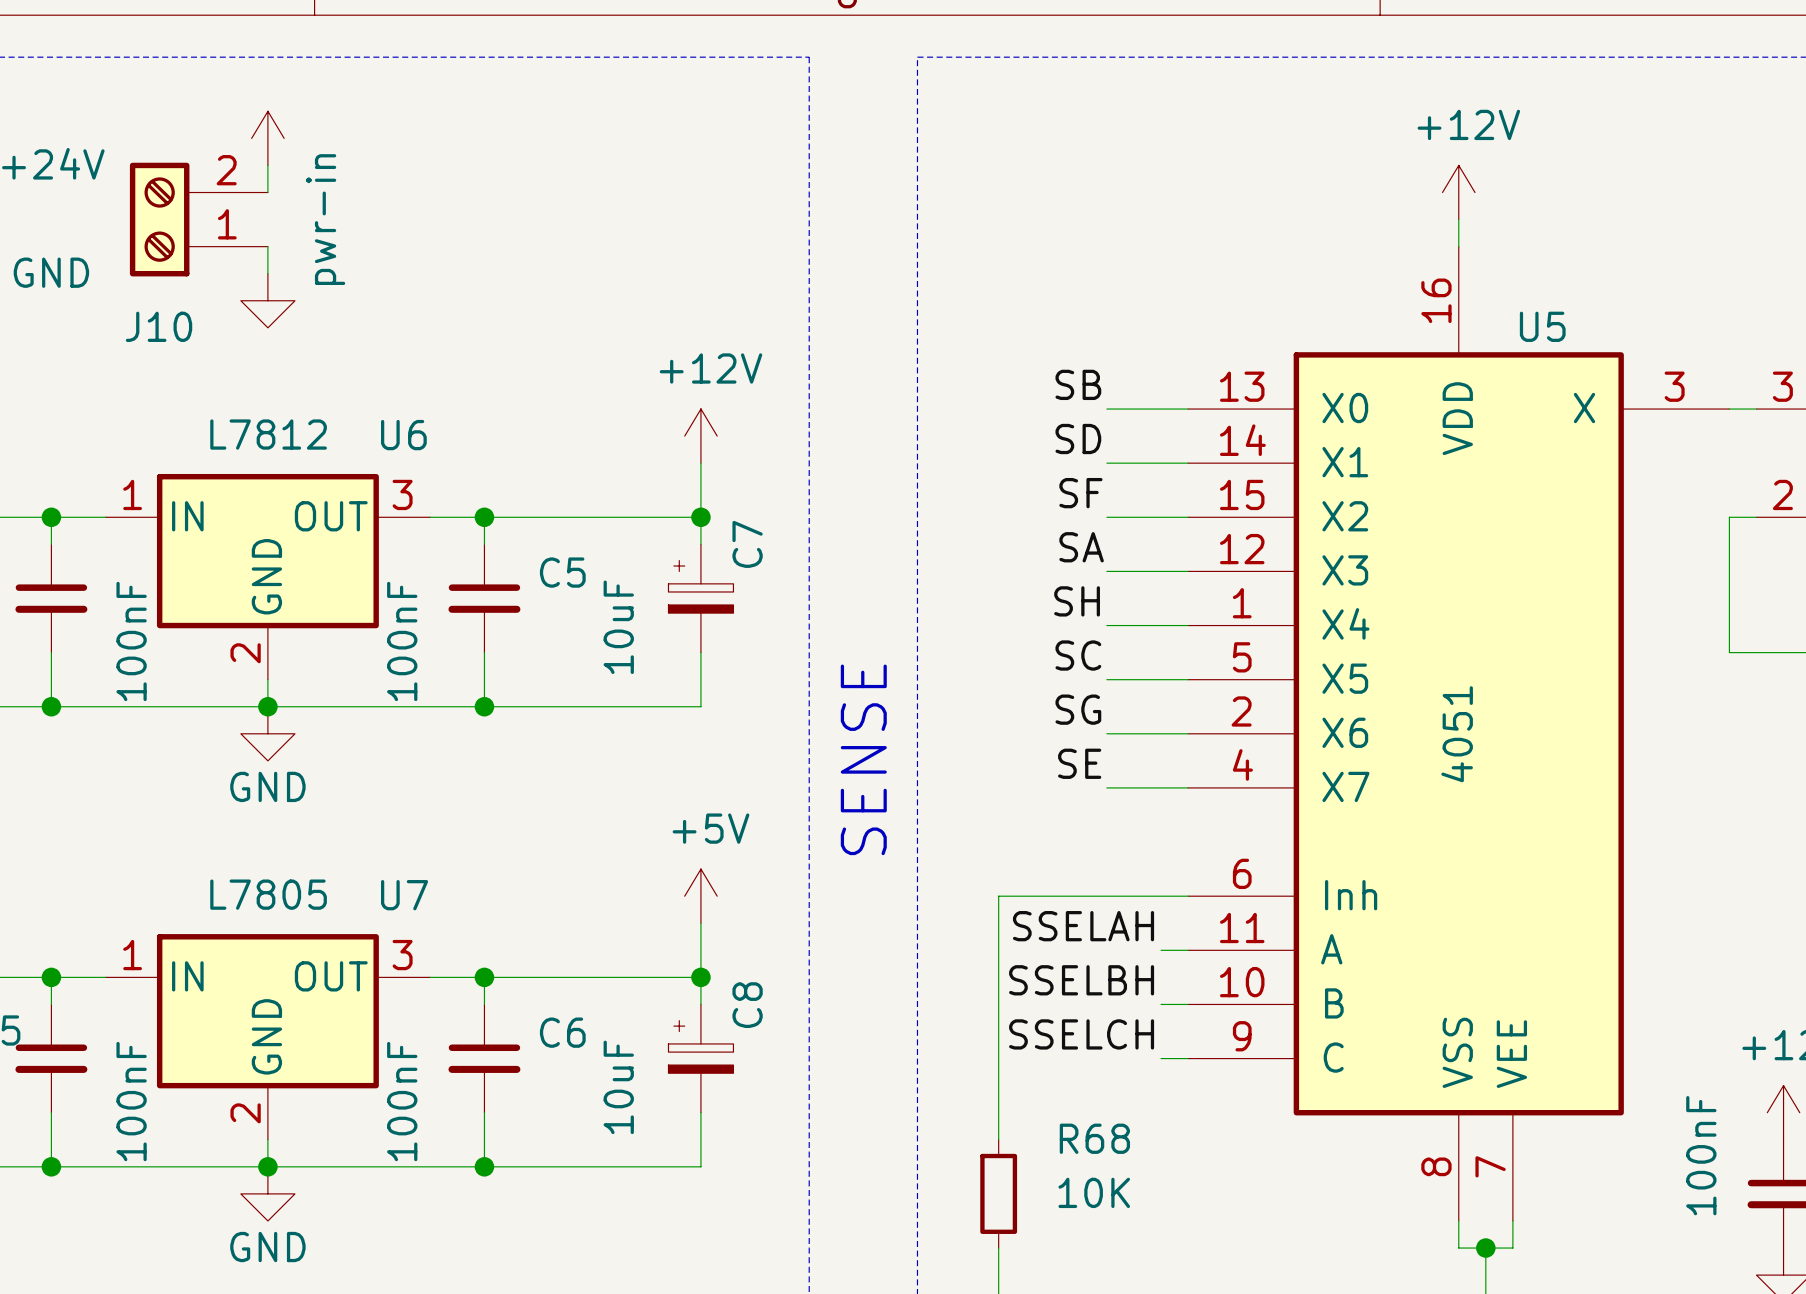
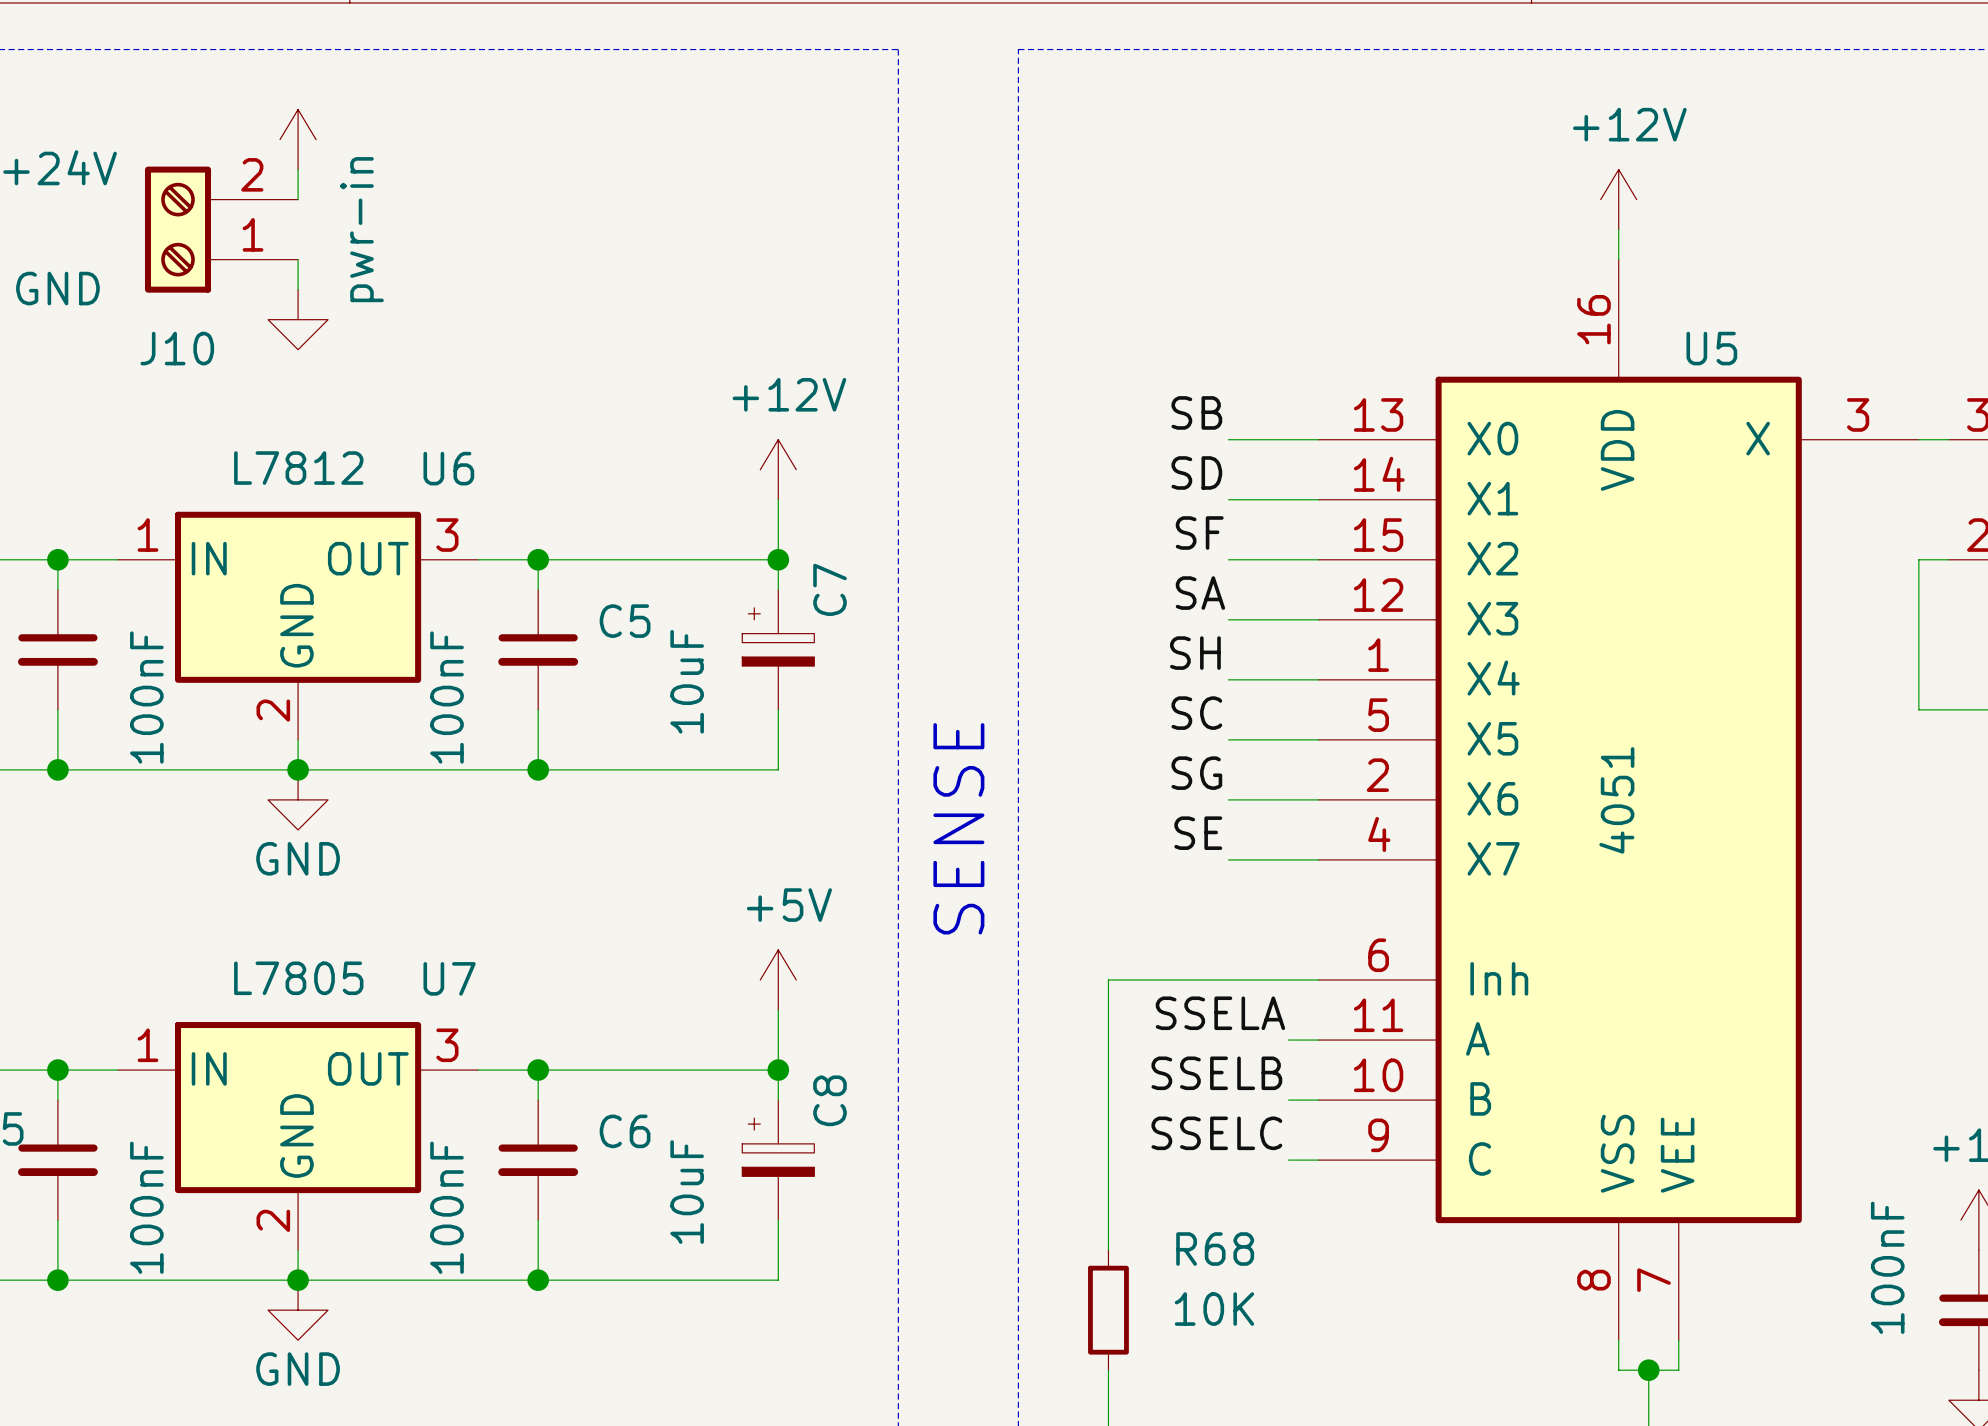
label: SSELAH (1083, 926) -> SSELA (1220, 1013)
label: SSELBH (1081, 980) -> SSELB (1216, 1073)
label: SSELCH (1081, 1034) -> SSELC (1216, 1133)

